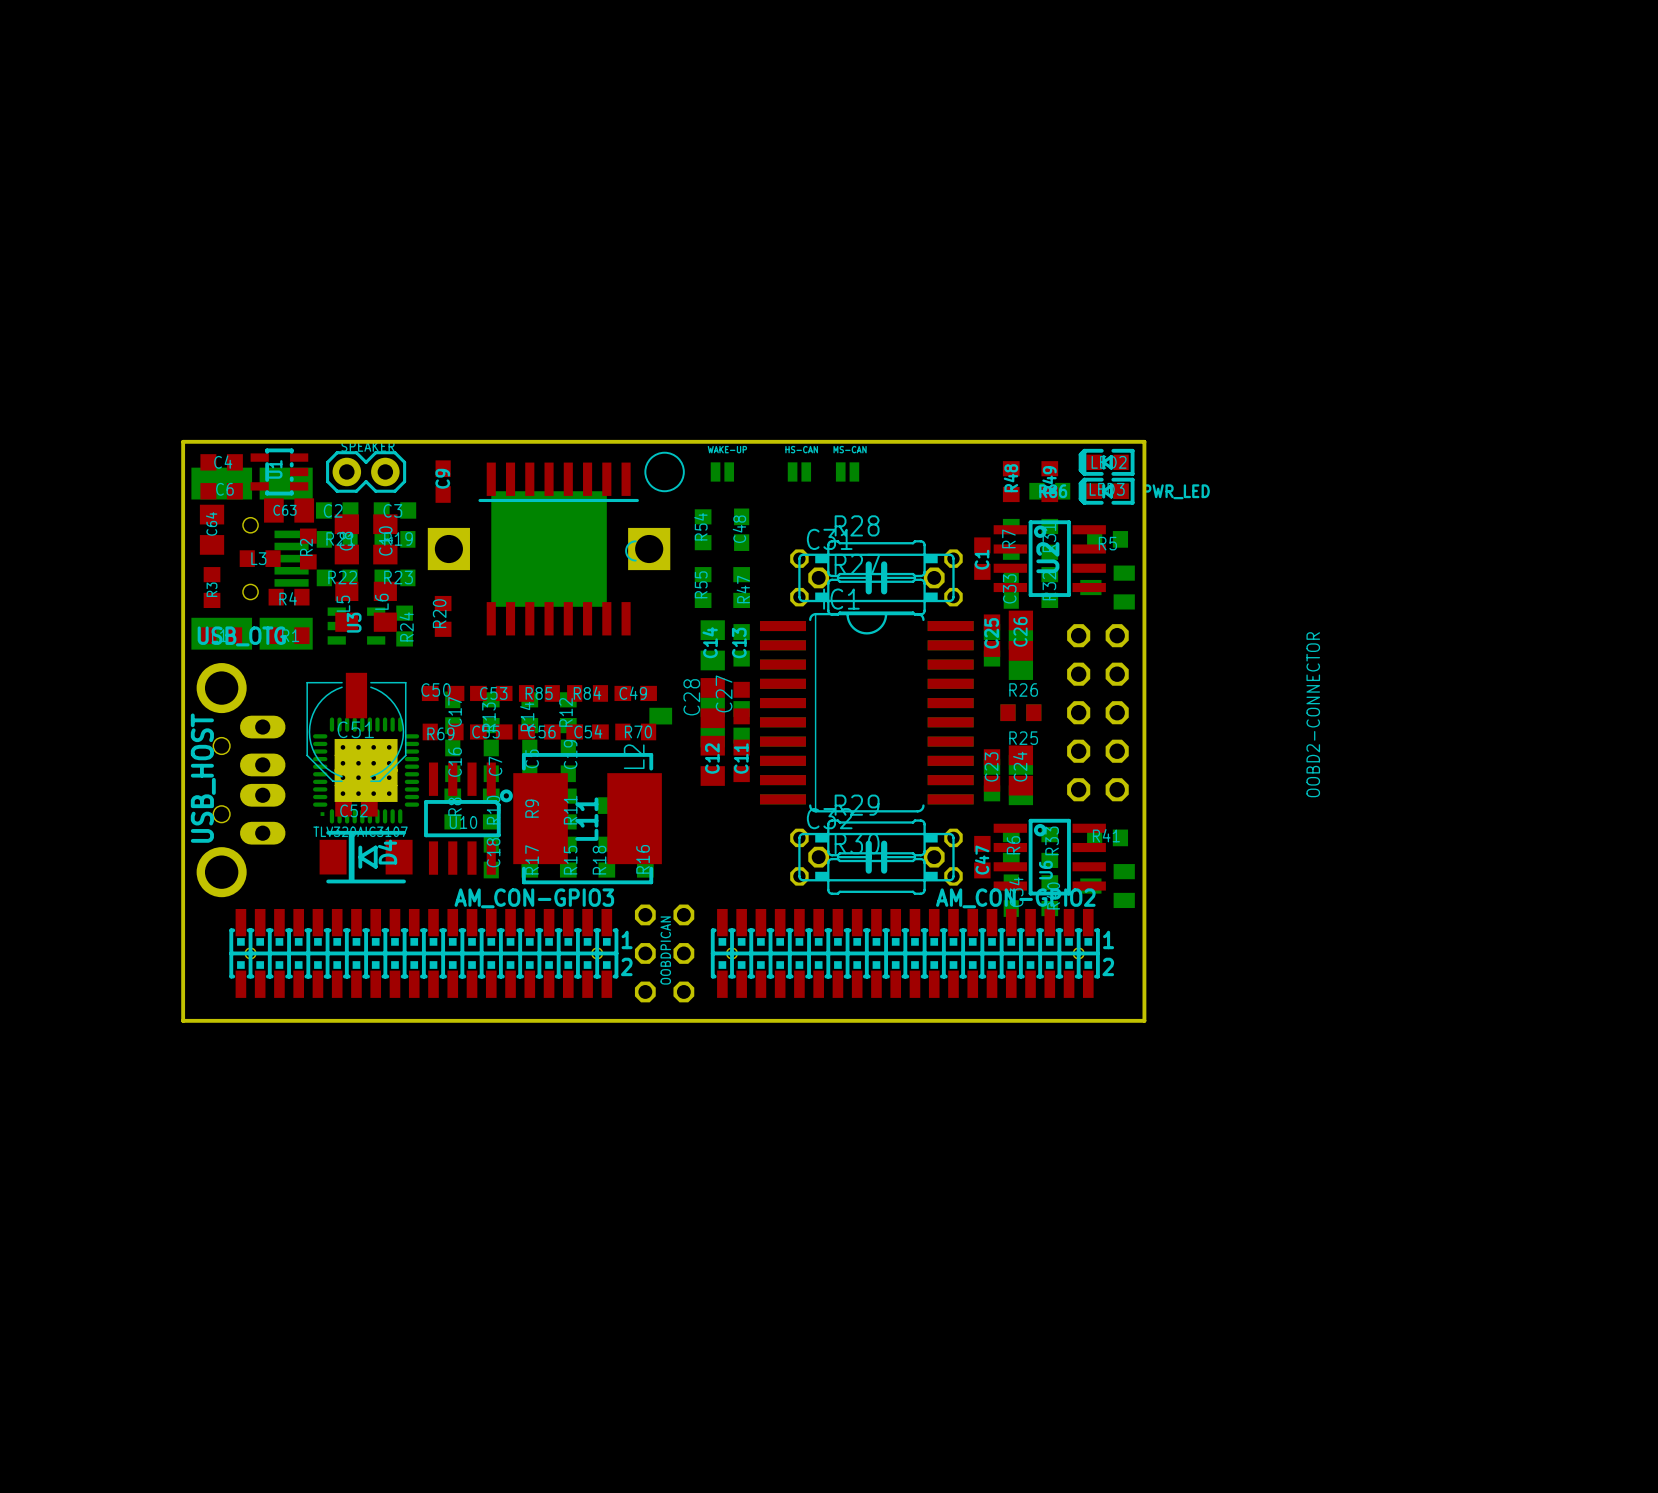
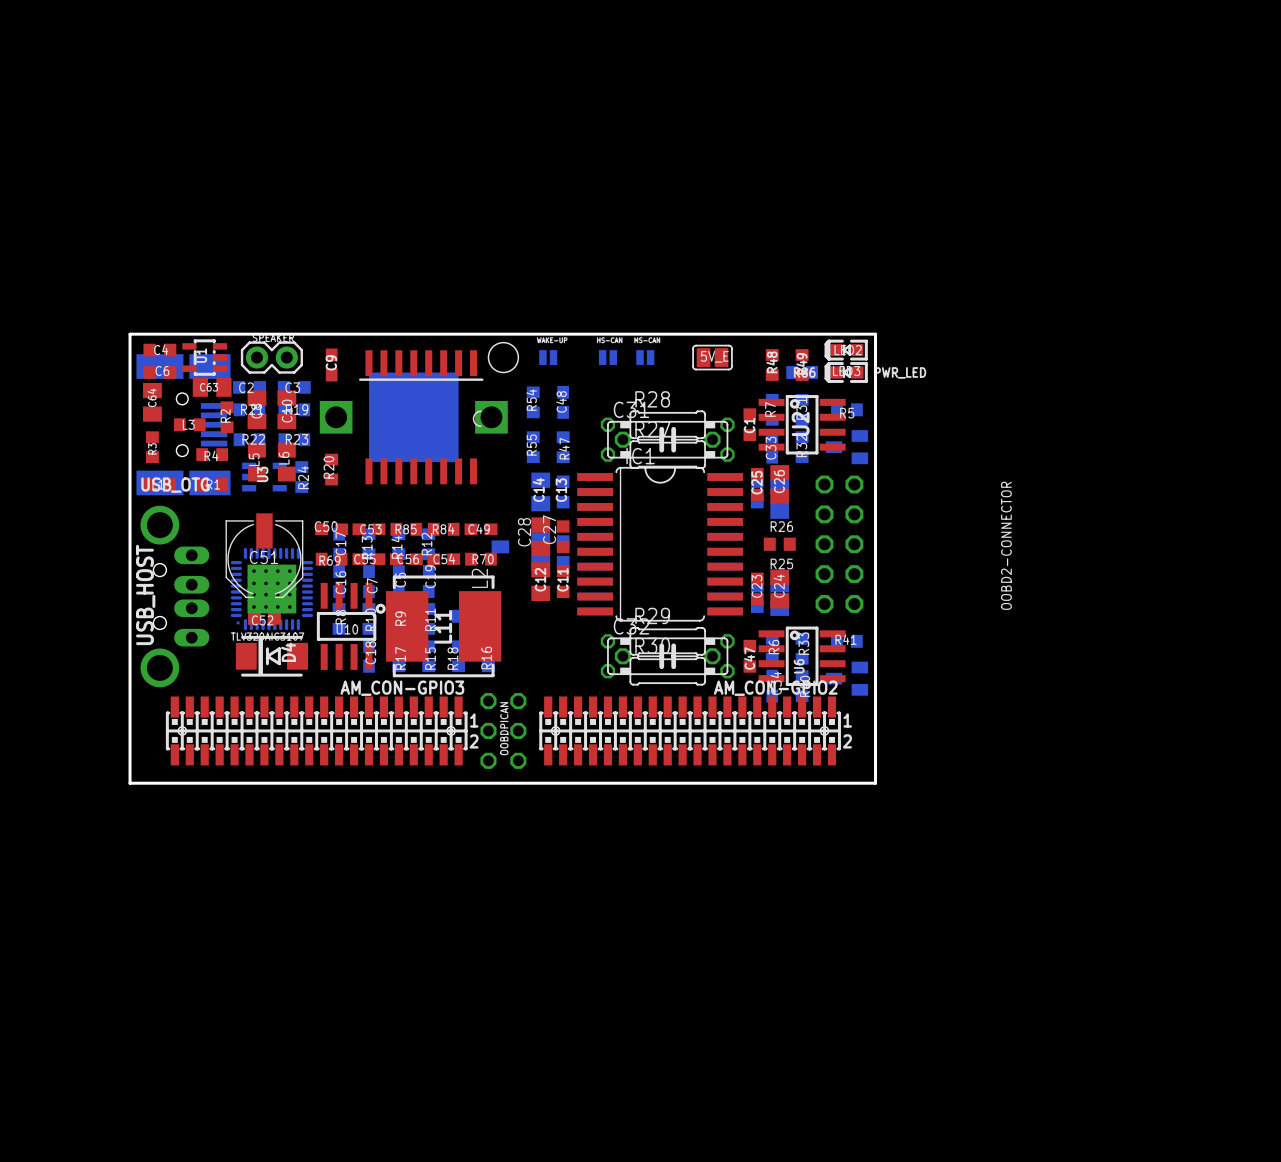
5V_E: none -> (712, 357)

